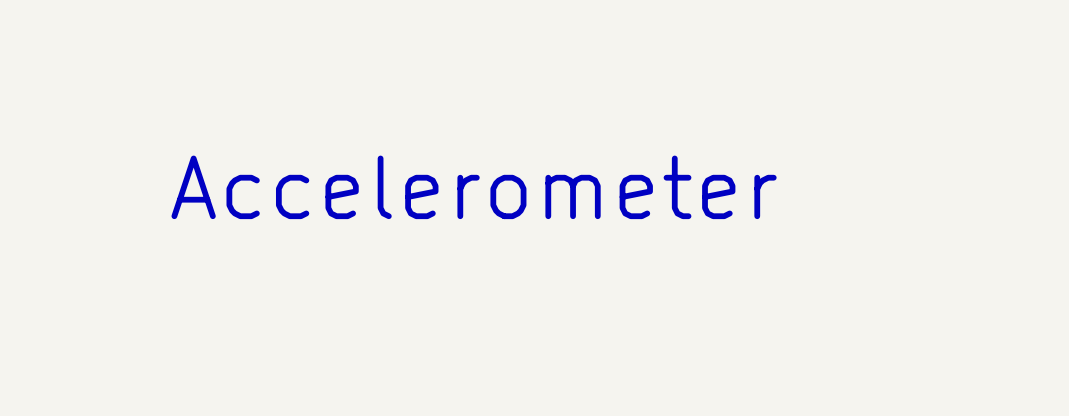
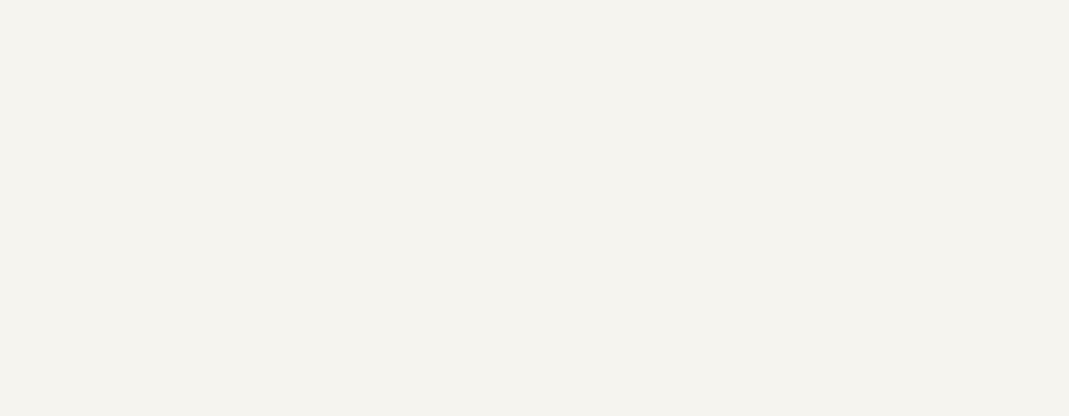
text: Accelerometer (474, 187) -> none

